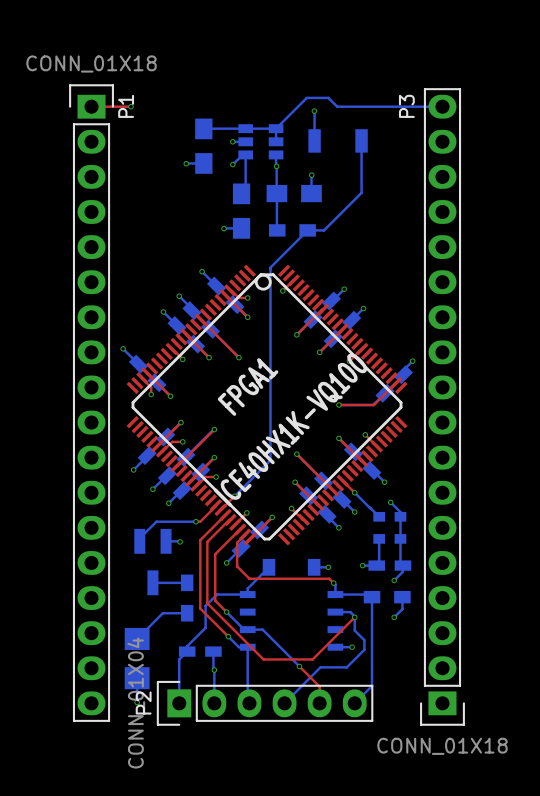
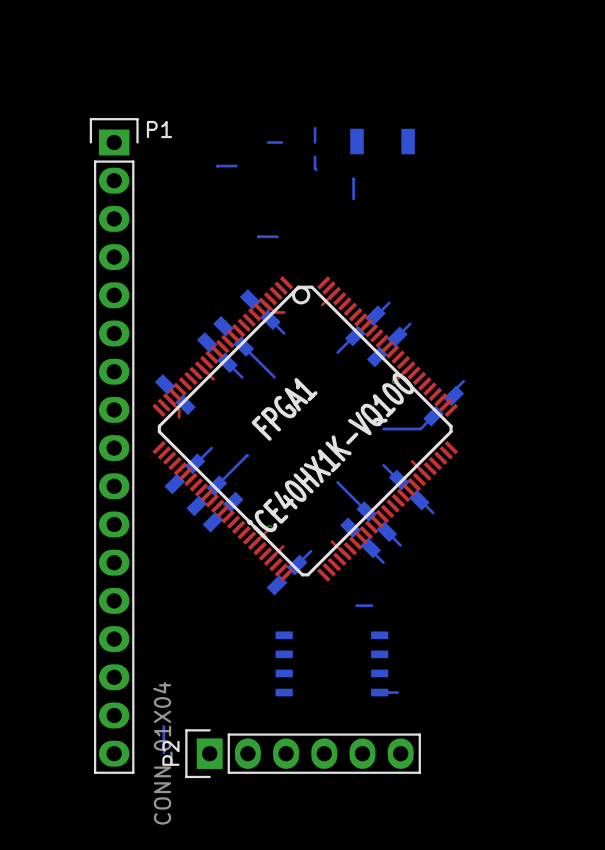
P1 value: CONN_01X18 (91, 64) -> none
P1 footprint: [69, 84, 114, 722] -> [89, 118, 139, 774]
top track: (91, 106) (131, 106) -> none
via: (131, 106) -> none
bottom track: (442, 106) (337, 106) (328, 97) (306, 97) (276, 128) (203, 128) -> none
bottom track: (314, 111) (314, 140) -> none
via: (314, 111) -> none
bottom track: (361, 140) (361, 192) (324, 230) (307, 230) (270, 267) (270, 460) (234, 496) -> none
via: (232, 141) -> none
part: (260, 141) -> none
part: (203, 146) -> none
via: (186, 163) -> none
bottom track: (232, 164) (242, 154) (245, 154) (245, 189) (241, 193) -> none
via: (232, 164) -> none
bottom track: (276, 166) (277, 230) -> none
via: (276, 166) -> none
via: (311, 175) -> none
part: (294, 193) -> none
part: (241, 211) -> none
via: (224, 228) -> none
part: (292, 230) -> none
bottom track: (202, 271) (216, 286) -> none
via: (202, 271) -> none
via: (344, 289) -> none
via: (282, 290) -> none
top track: (225, 295) (247, 317) -> none
bottom track: (179, 296) (191, 310) -> none
via: (179, 296) -> none
via: (247, 297) -> none
via: (363, 308) -> none
top track: (323, 309) (296, 334) -> none
bottom track: (163, 312) (177, 325) -> none
via: (163, 312) -> none
via: (247, 317) -> none
top track: (200, 319) (238, 357) -> none
top track: (342, 329) (319, 352) -> none
top track: (186, 334) (209, 357) -> none
via: (296, 334) -> none
bottom track: (123, 348) (138, 364) -> none
via: (123, 348) -> none
via: (319, 352) -> none
via: (209, 357) -> none
via: (238, 357) -> none
via: (182, 359) -> none
via: (412, 361) -> none
top track: (147, 373) (170, 396) -> none
top track: (396, 382) (374, 405) (338, 405) -> none
via: (151, 394) -> none
via: (170, 396) -> none
via: (338, 405) -> none
P3: CONN_01X18 (442, 406) -> none
top track: (181, 422) (157, 446) -> none
via: (181, 422) -> none
top track: (214, 429) (176, 466) -> none
via: (214, 429) -> none
FPGA1 value: ICE40HX1K-VQ100 (290, 430) -> iCE40HX1K-VQ100 (330, 456)
via: (365, 434) -> none
top track: (338, 438) (362, 461) -> none
via: (338, 438) -> none
top track: (182, 441) (172, 441) (162, 451) -> none
via: (182, 441) -> none
top track: (296, 454) (333, 490) -> none
via: (296, 454) -> none
bottom track: (147, 455) (133, 469) -> none
top track: (214, 457) (191, 480) -> none
via: (214, 457) -> none
via: (133, 469) -> none
bottom track: (167, 475) (152, 489) -> none
top track: (216, 476) (205, 476) (196, 485) -> none
via: (216, 476) -> none
top track: (342, 480) (354, 492) -> none
top track: (295, 482) (318, 505) -> none
via: (295, 482) -> none
via: (384, 482) -> none
via: (152, 489) -> none
bottom track: (182, 490) (168, 503) -> none
bottom track: (354, 492) (379, 516) -> none
via: (354, 492) -> none
bottom track: (390, 502) (400, 512) (400, 563) (402, 565) (402, 571) (394, 580) -> none
via: (390, 502) -> none
via: (168, 503) -> none
top track: (215, 505) (200, 521) (195, 521) -> none
via: (291, 508) -> none
via: (246, 512) -> none
via: (354, 512) -> none
top track: (225, 514) (200, 540) (200, 608) (228, 636) -> none
top track: (272, 517) (249, 539) -> none
via: (272, 517) -> none
top track: (230, 519) (207, 541) (207, 603) (263, 659) (312, 659) (354, 617) -> none
bottom track: (195, 521) (156, 521) (139, 538) (139, 541) -> none
via: (195, 521) -> none
via: (338, 527) -> none
part: (389, 527) -> none
top track: (240, 529) (215, 554) (215, 600) (226, 612) -> none
top track: (245, 534) (237, 542) (237, 566) (249, 578) (329, 578) (333, 583) -> none
bottom track: (379, 538) (379, 563) (376, 565) (362, 565) -> none
bottom track: (166, 541) (180, 541) -> none
via: (180, 541) -> none
bottom track: (241, 548) (226, 562) -> none
part: (152, 562) -> none
via: (226, 562) -> none
via: (362, 565) -> none
part: (389, 565) -> none
bottom track: (268, 567) (247, 588) (247, 594) (216, 594) (205, 605) (205, 627) (187, 646) (187, 651) (179, 659) (179, 703) -> none
part: (291, 567) -> none
via: (328, 567) -> none
via: (394, 580) -> none
bottom track: (152, 582) (187, 582) -> none
bottom track: (333, 583) (335, 594) (369, 594) (372, 597) (372, 686) (354, 703) -> none
via: (333, 583) -> none
part: (387, 597) -> none
bottom track: (402, 597) (402, 609) (394, 617) -> none
part: (187, 598) -> none
bottom track: (226, 612) (244, 629) (262, 629) (299, 666) -> none
via: (226, 612) -> none
bottom track: (335, 612) (350, 612) (355, 617) (354, 630) (364, 640) (364, 649) (346, 667) (320, 667) (284, 703) -> none
bottom track: (187, 613) (162, 613) (137, 638) -> none
via: (354, 617) -> none
via: (394, 617) -> none
bottom track: (228, 636) (238, 647) (247, 647) (247, 701) (249, 703) -> none
via: (228, 636) -> none
via: (352, 647) -> none
part: (200, 651) -> none
bottom track: (213, 651) (214, 703) -> none
part: (137, 658) -> none
top track: (299, 666) (319, 686) (319, 703) -> none
via: (299, 666) -> none
via: (214, 670) -> none
via: (137, 702) -> none

